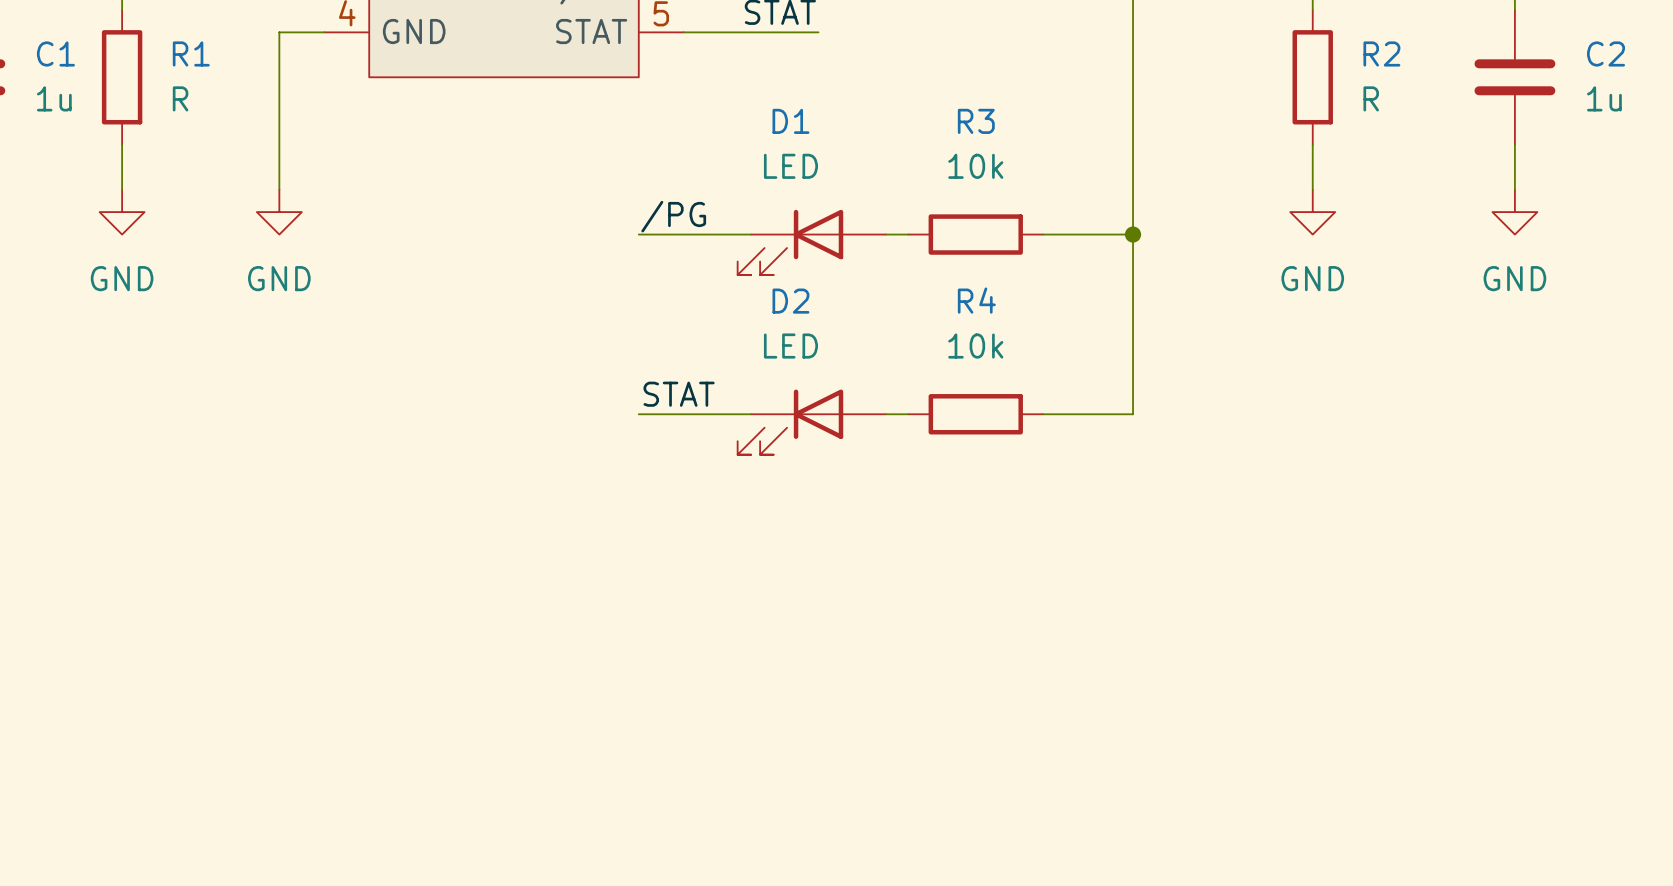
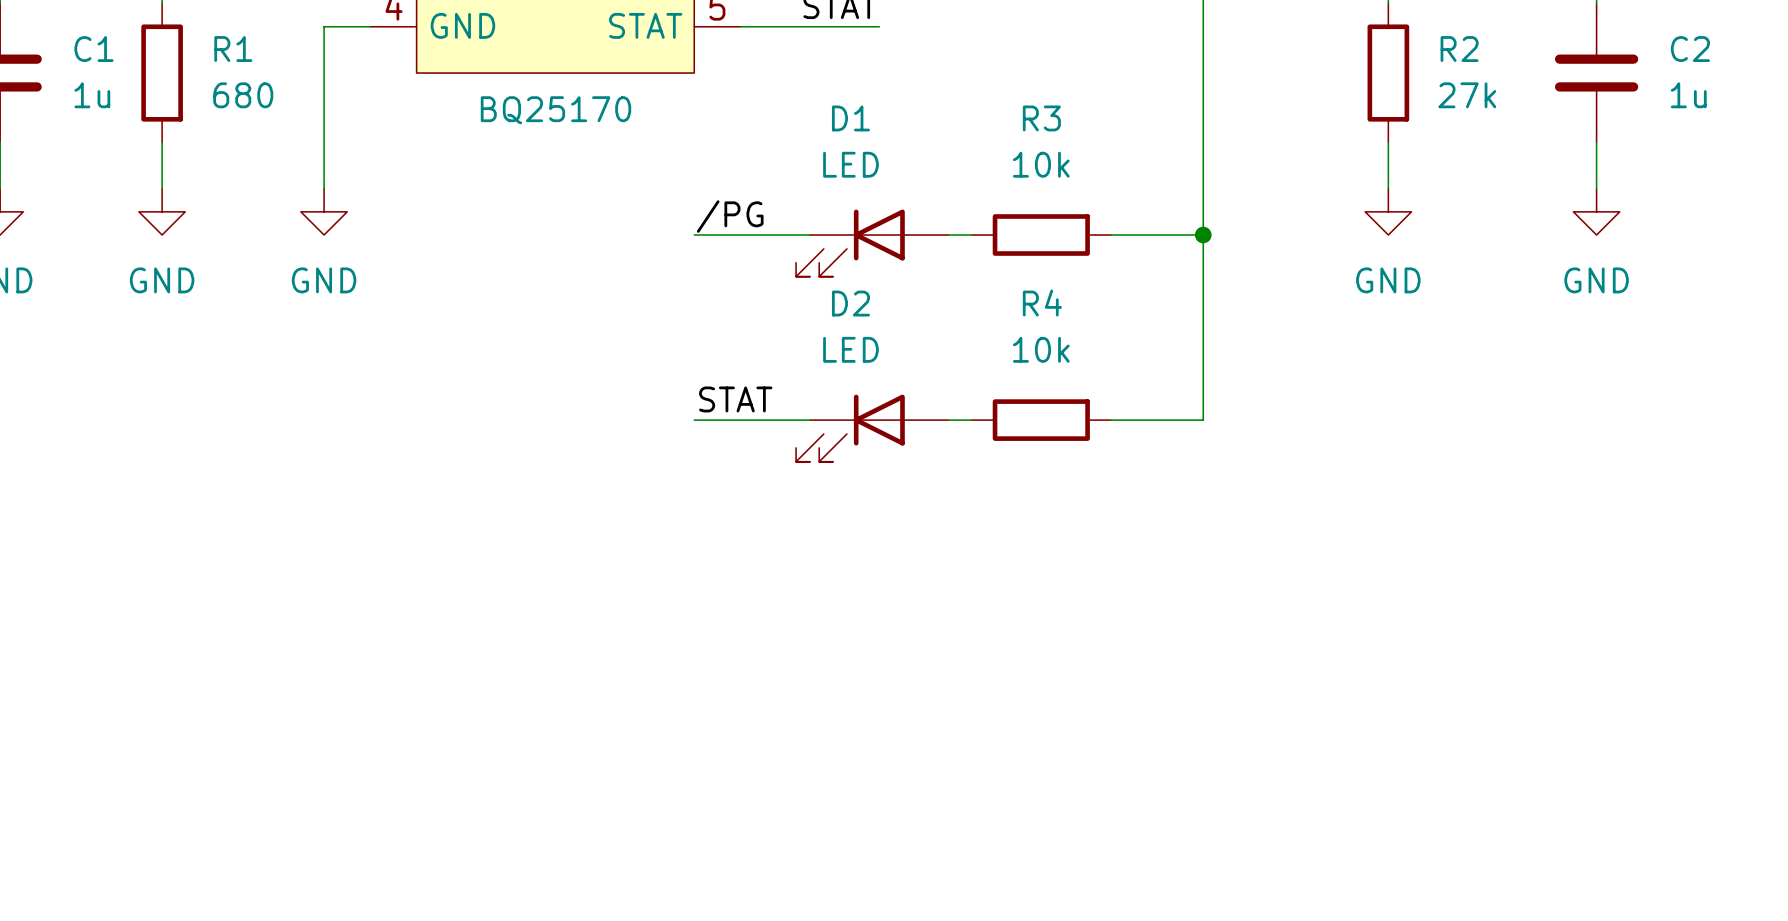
R1 value: R (180, 98) -> 680 (243, 95)
R2 value: R (1371, 98) -> 27k (1467, 95)
part value: none -> BQ25170 (555, 110)

